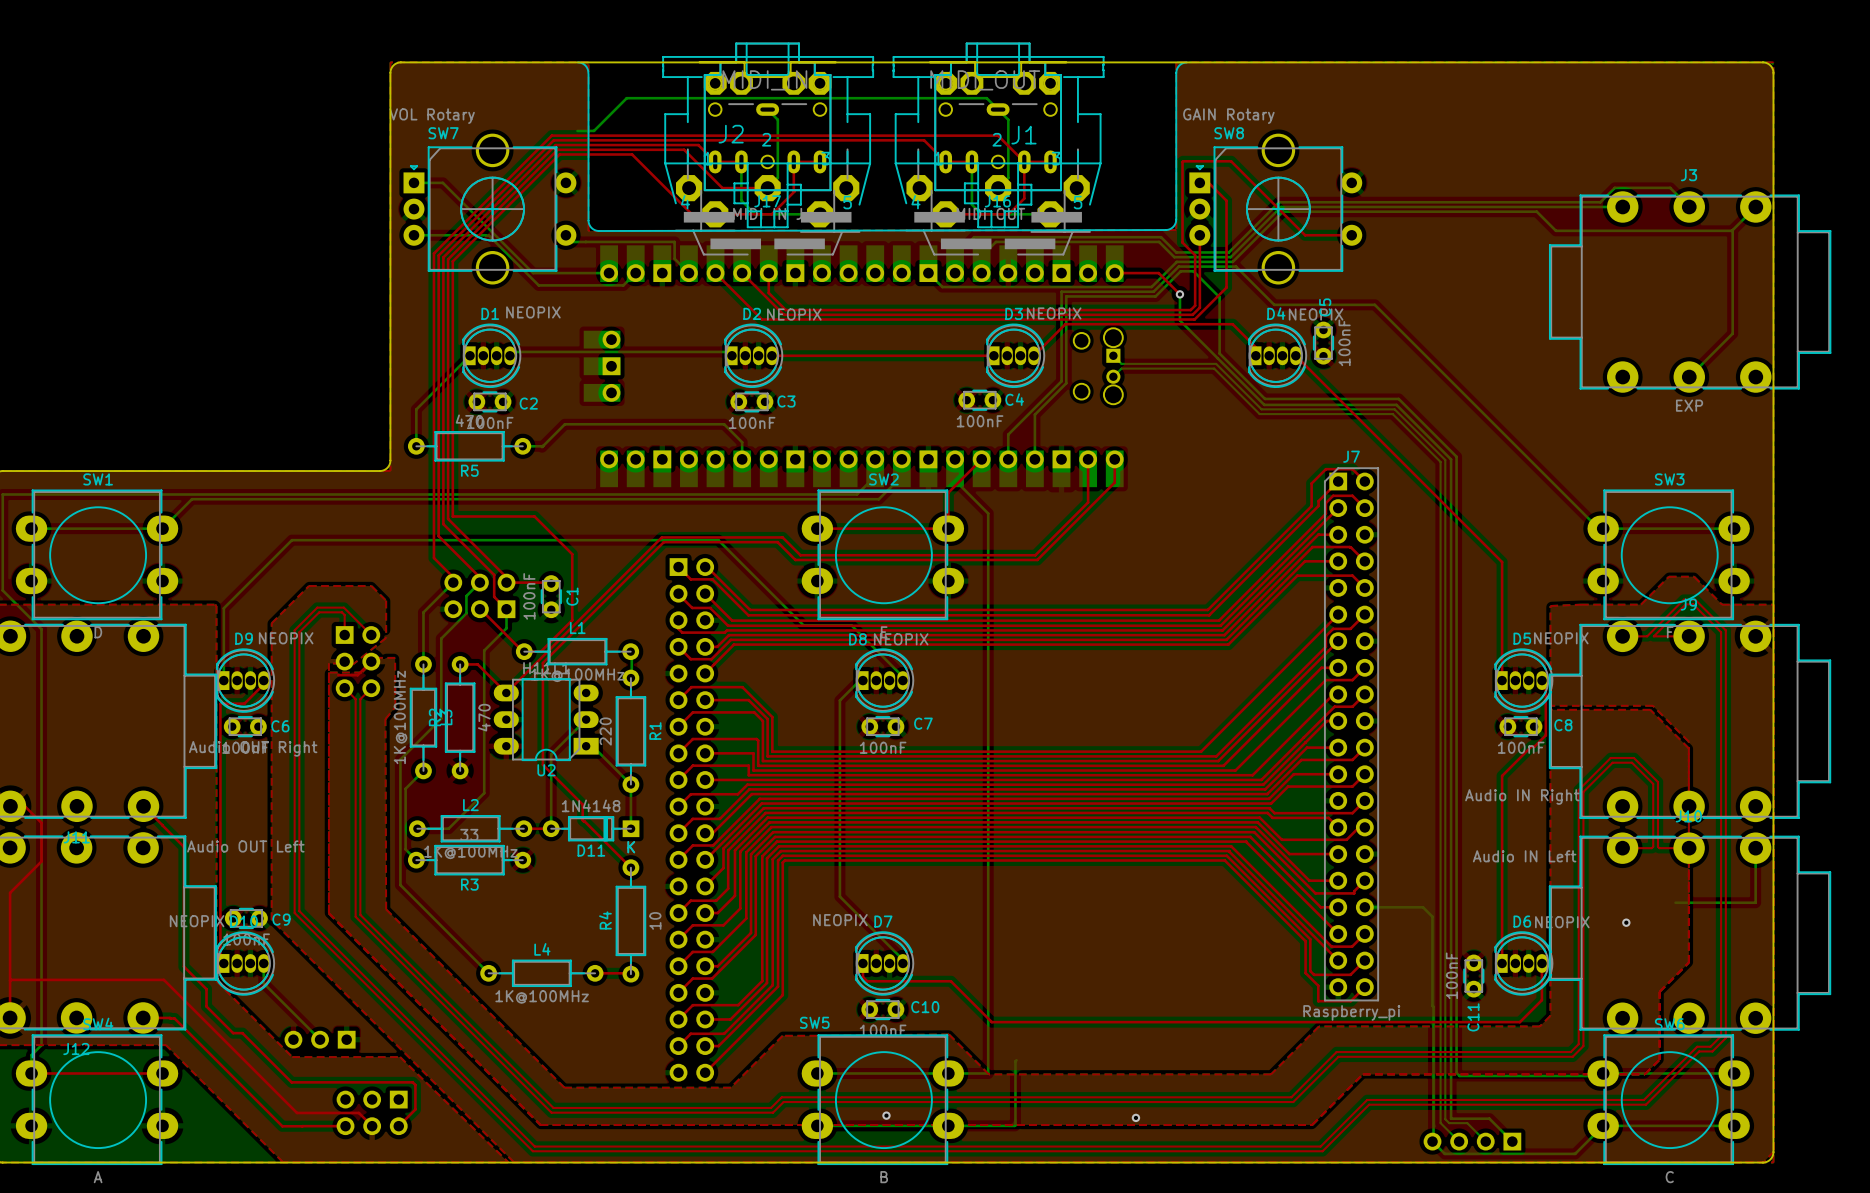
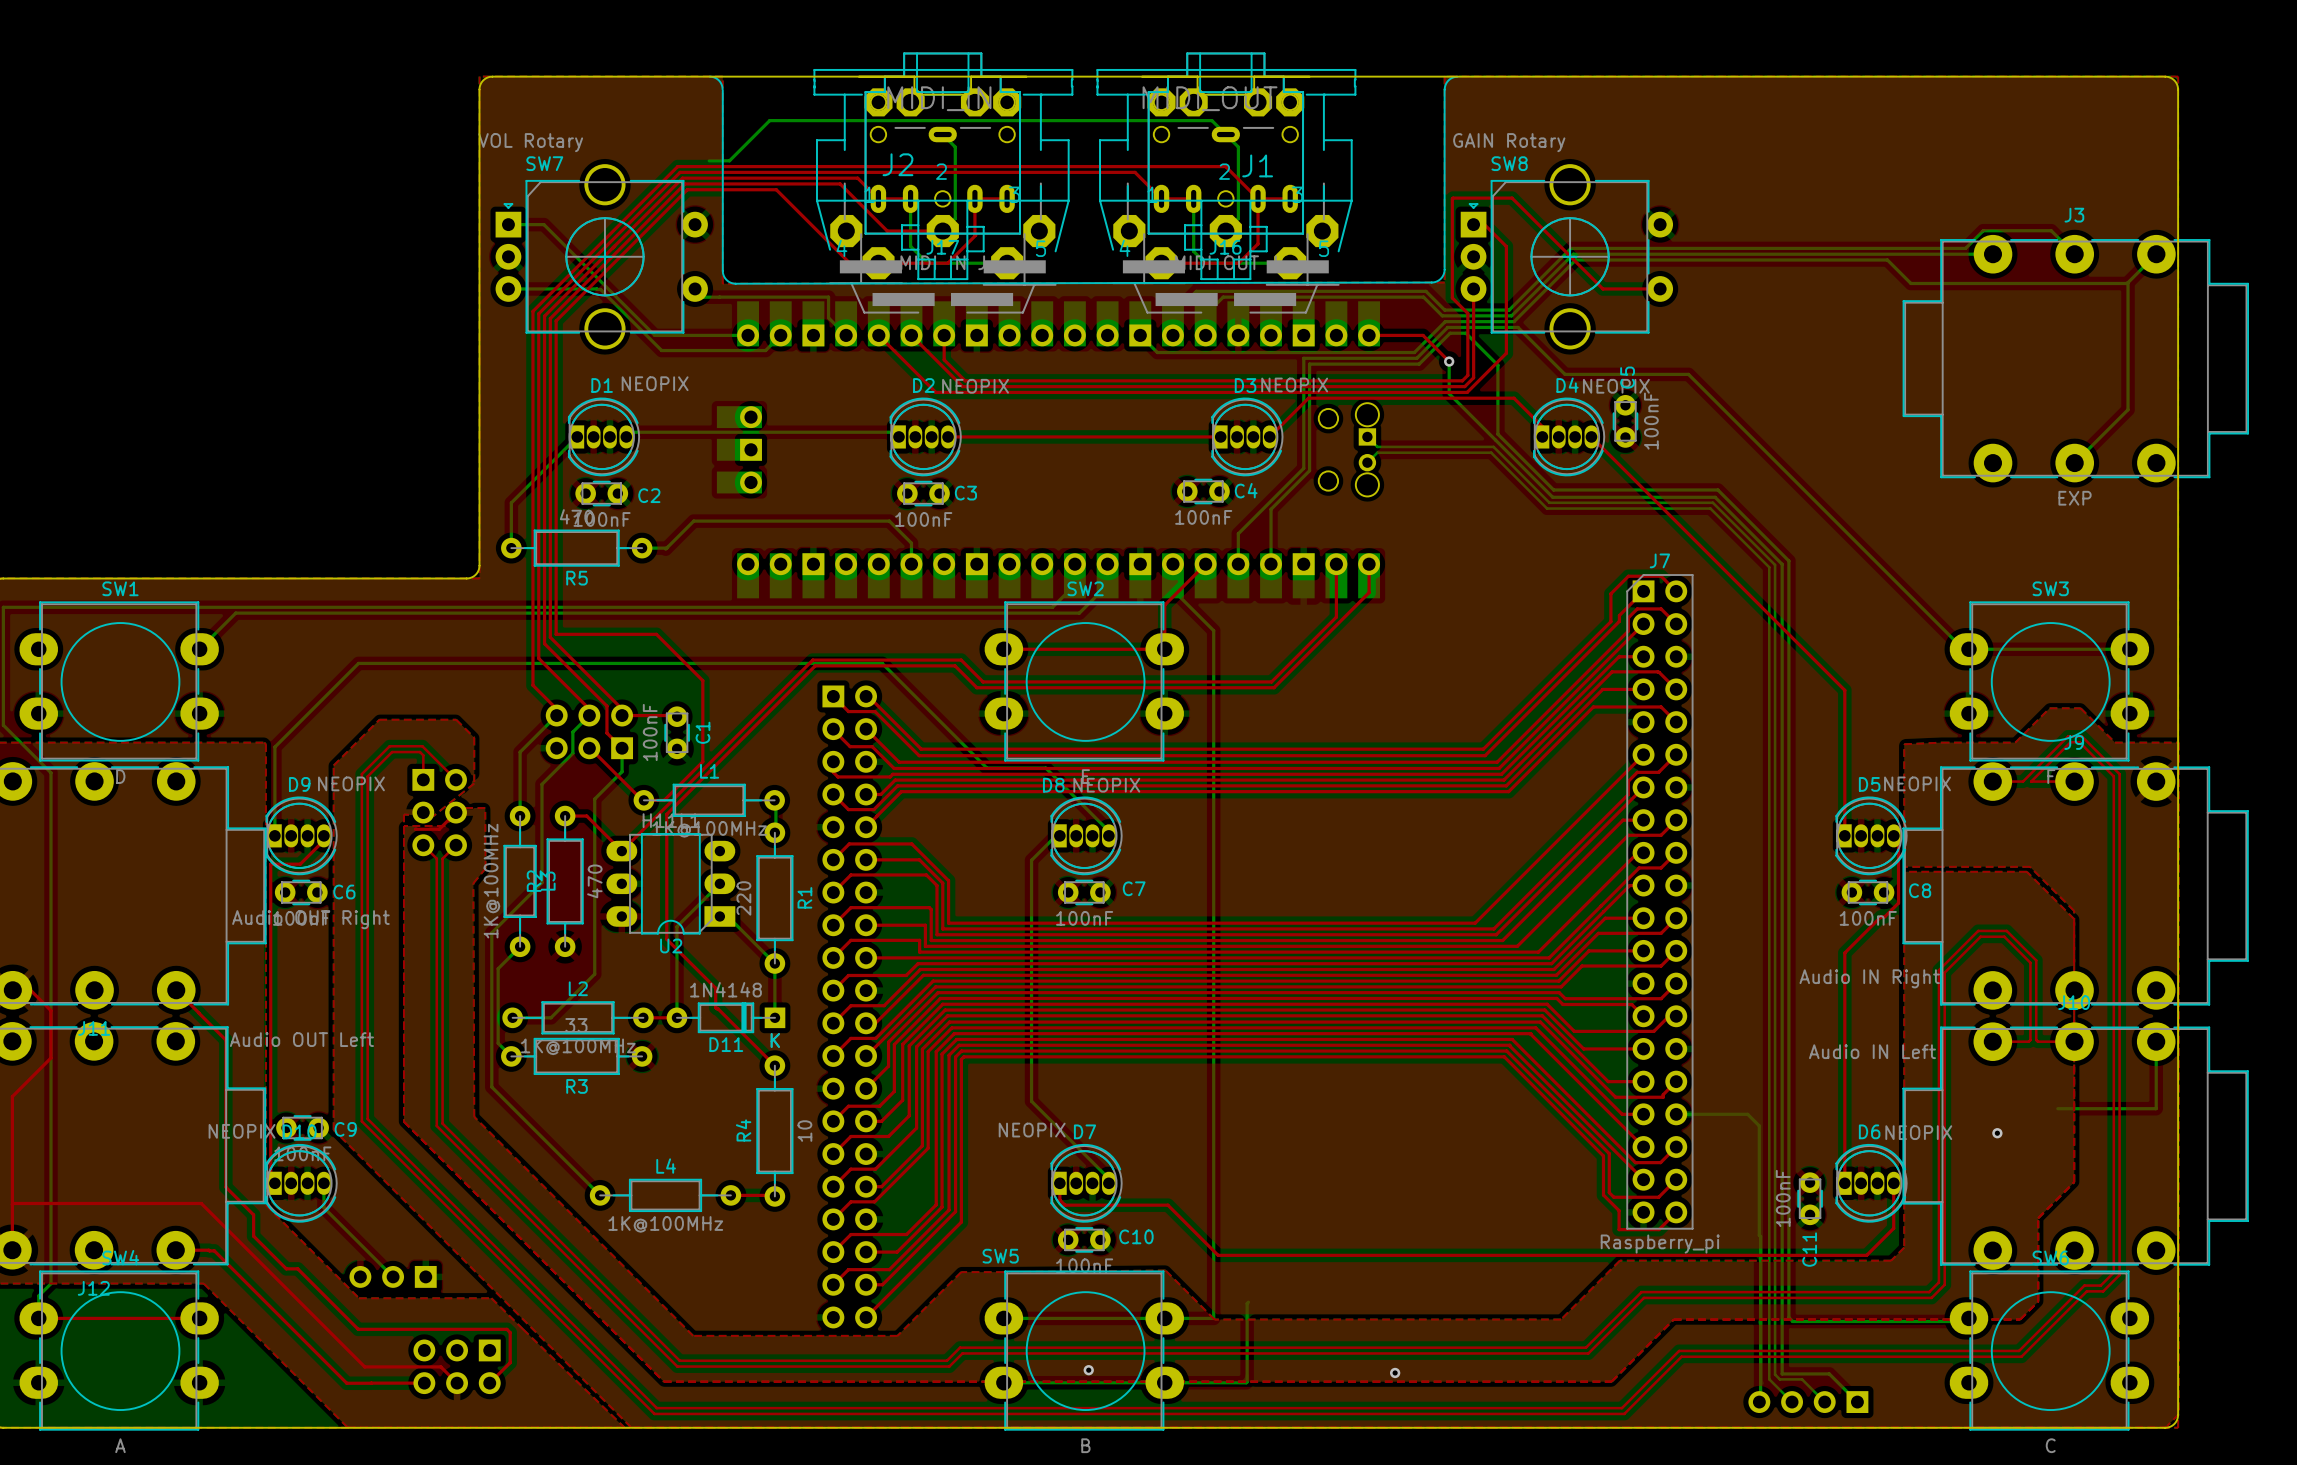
bottom track: (31, 528) (162, 528) -> none
bottom track: (1603, 1073) (1734, 1073) -> none
bottom track: (1734, 1125) (1603, 1125) (1575, 1153) (1444, 1153) (1432, 1141) -> none

